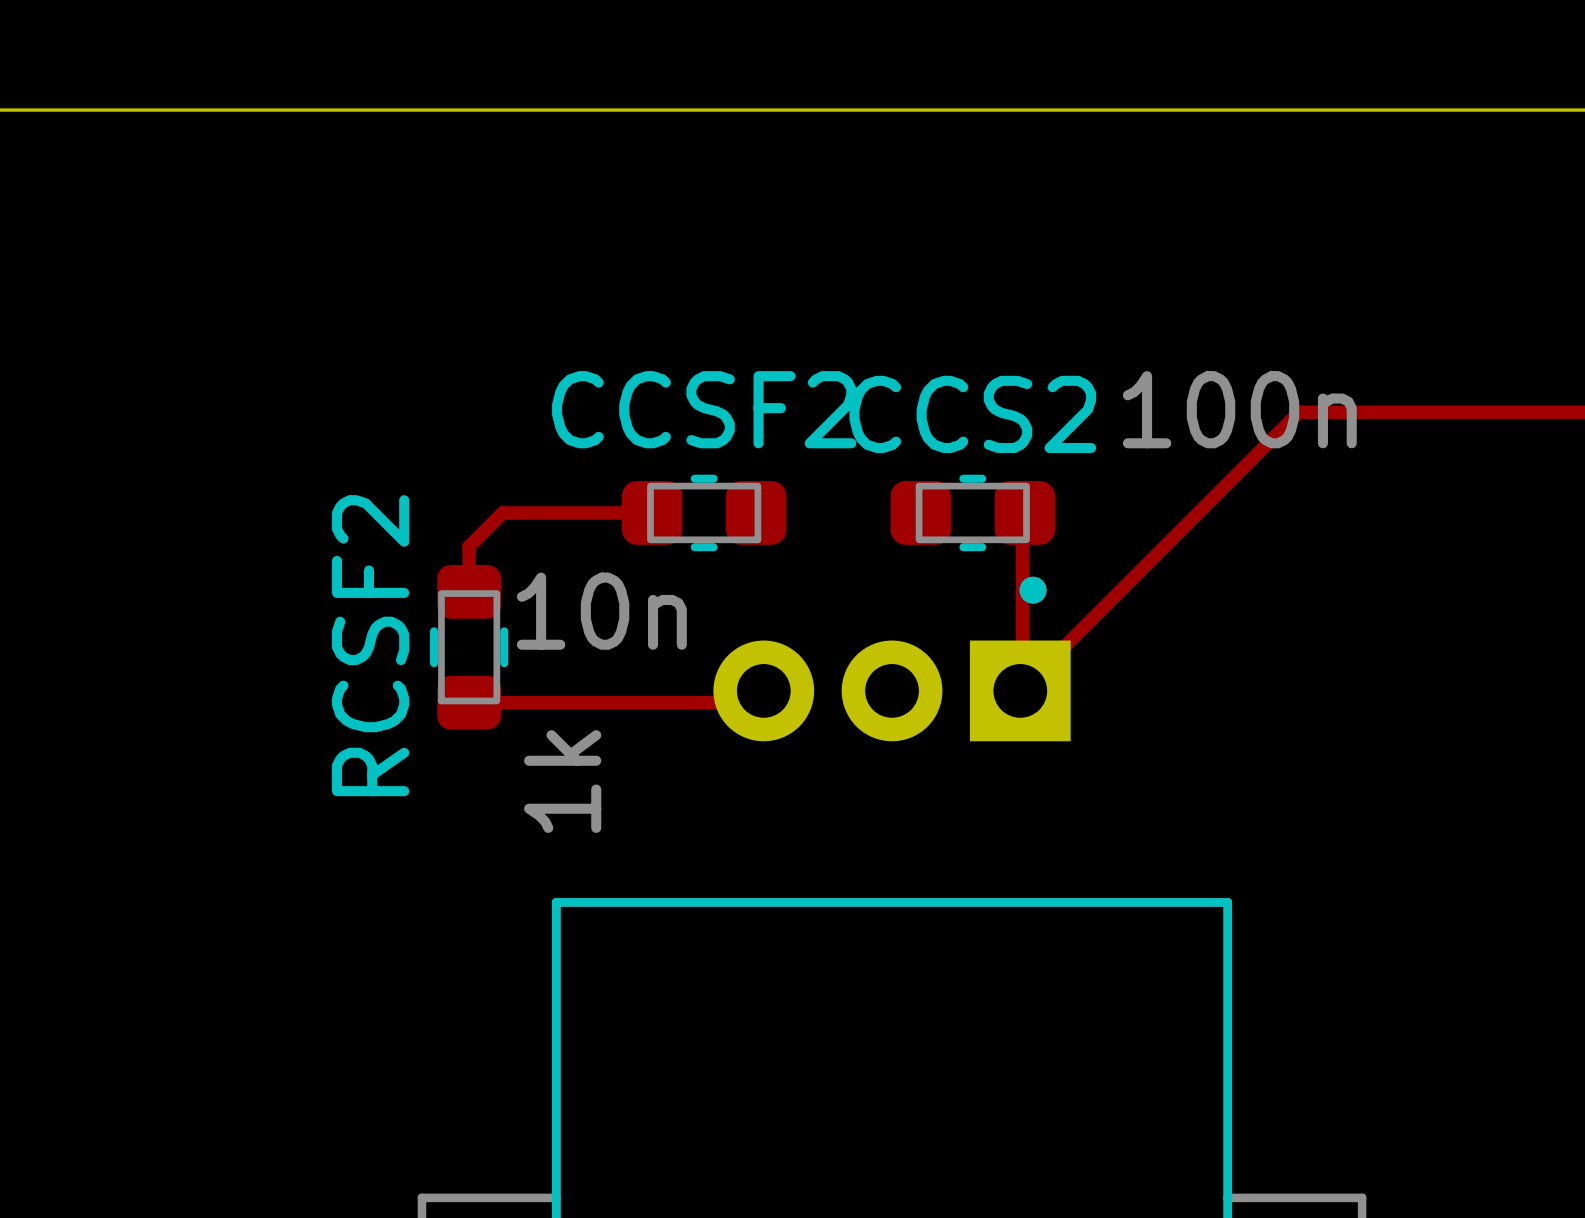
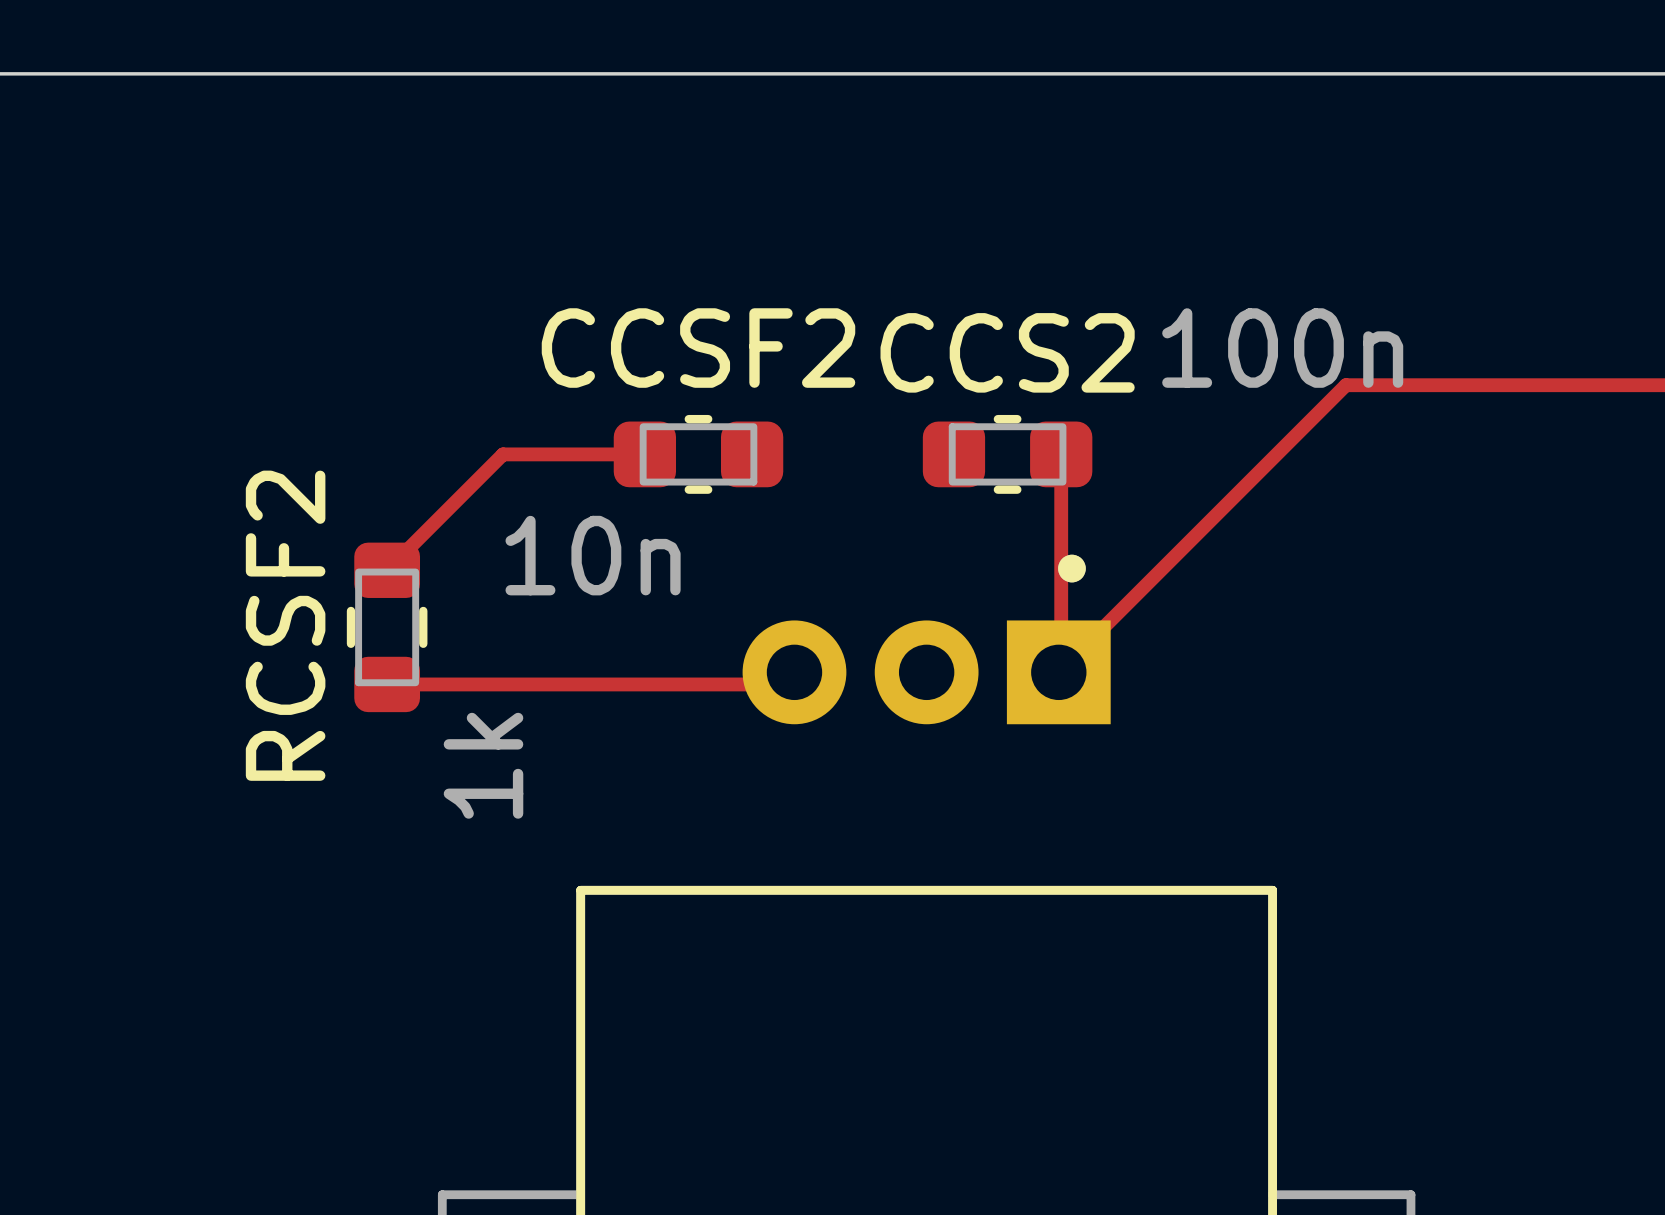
track: none -> (644, 454) (503, 454) (387, 570)
track: (652, 512) (502, 512) (469, 546) (469, 591) -> none
CCSF2 position: (704, 512) -> (698, 454)
CCS2 position: (972, 512) -> (1007, 454)
RCSF2 position: (469, 647) -> (387, 627)
track: none -> (387, 684) (490, 684)

